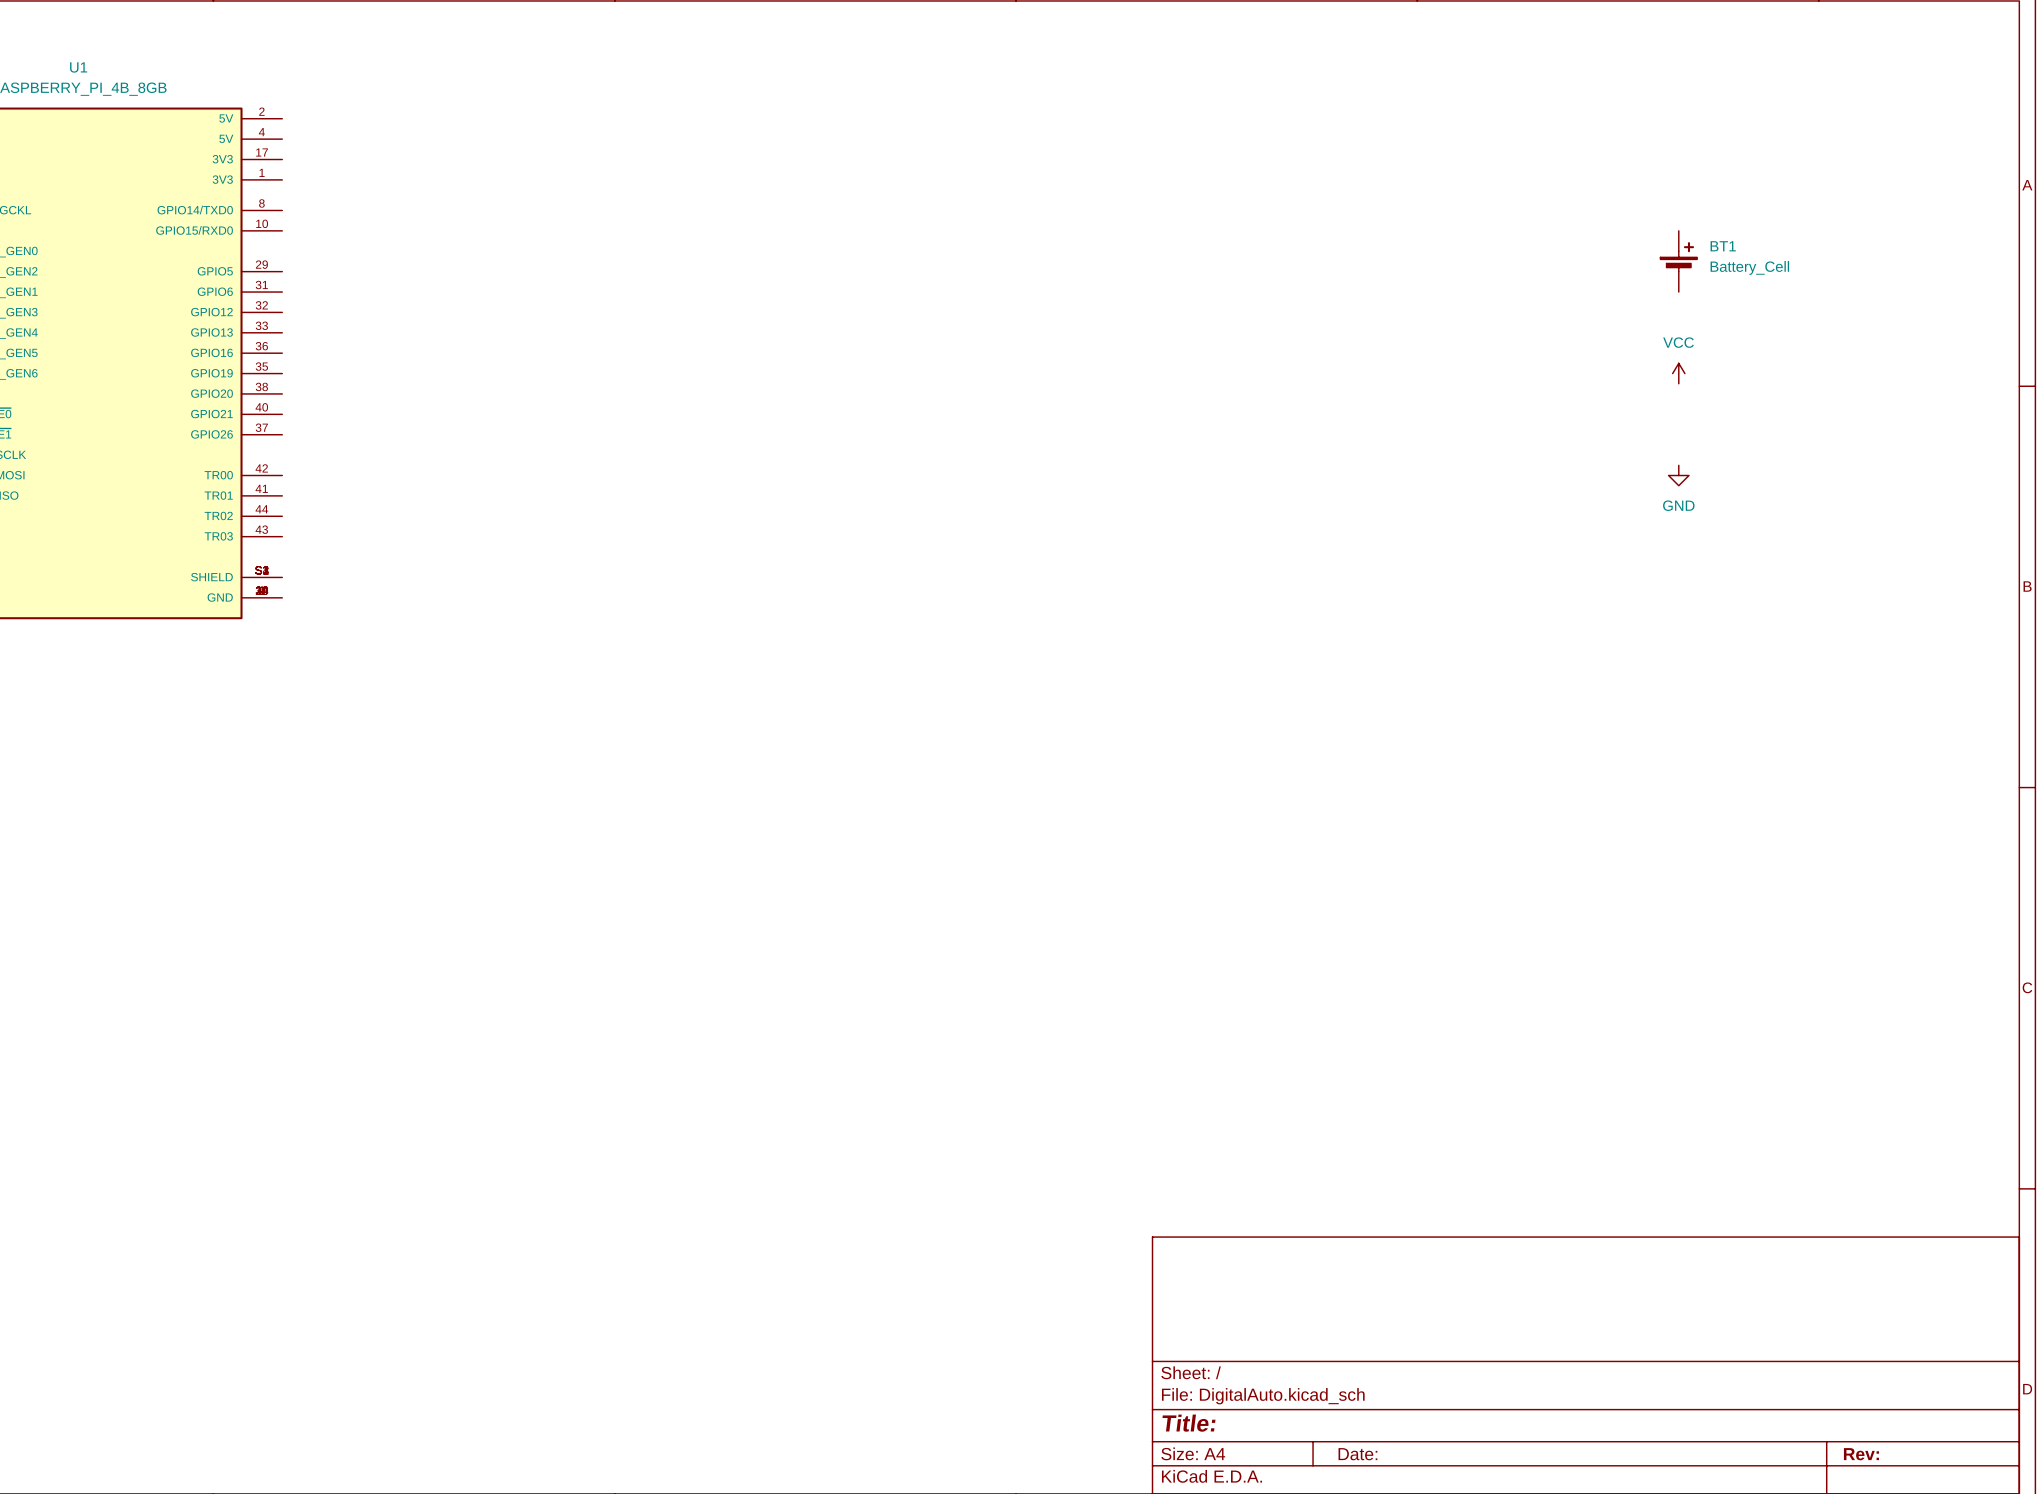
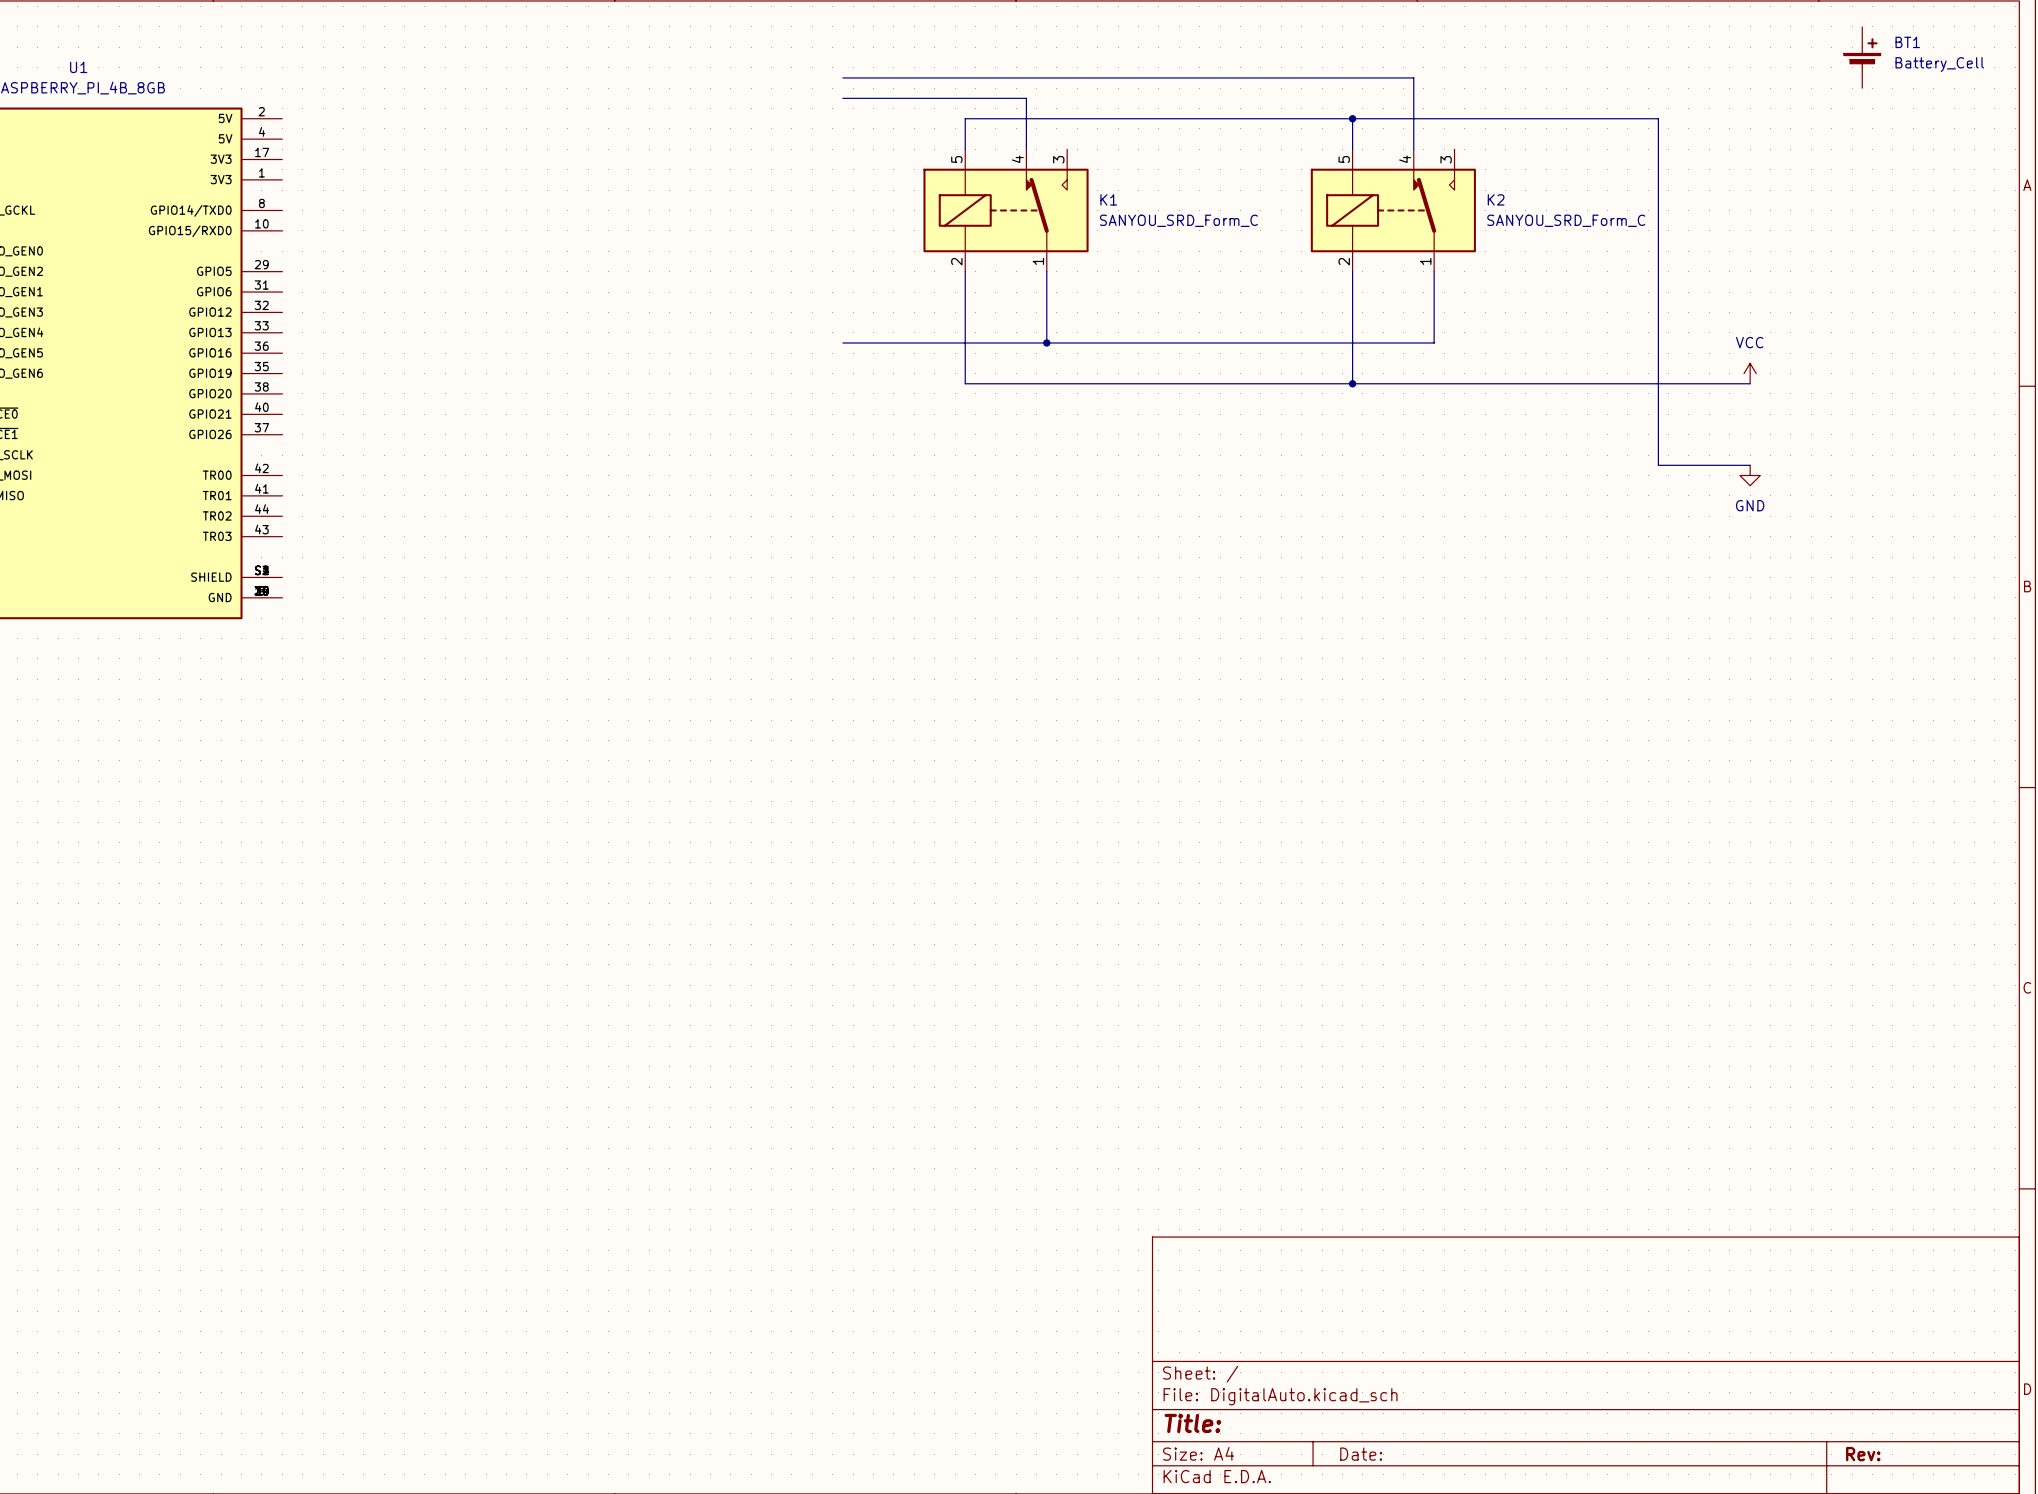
wire: none -> (842, 77) (1413, 77) (1413, 149)
wire: none -> (842, 98) (1026, 98) (1026, 149)
wire: none -> (1352, 118) (1352, 149)
junction: none -> (1352, 118)
wire: none -> (965, 149) (965, 118) (1658, 118) (1658, 465) (1750, 465)
K1: none -> SANYOU_SRD_Form_C (1006, 210)
K2: none -> SANYOU_SRD_Form_C (1393, 210)
BT1 position: (1678, 261) -> (1862, 57)
wire: none -> (965, 271) (965, 383) (1750, 383)
wire: none -> (1046, 271) (1046, 342)
wire: none -> (1352, 271) (1352, 383)
wire: none -> (1434, 271) (1434, 342) (842, 342)
junction: none -> (1046, 342)
power symbol position: VCC (1678, 373) -> VCC (1750, 373)
junction: none -> (1352, 383)
power symbol position: GND (1678, 475) -> GND (1750, 475)

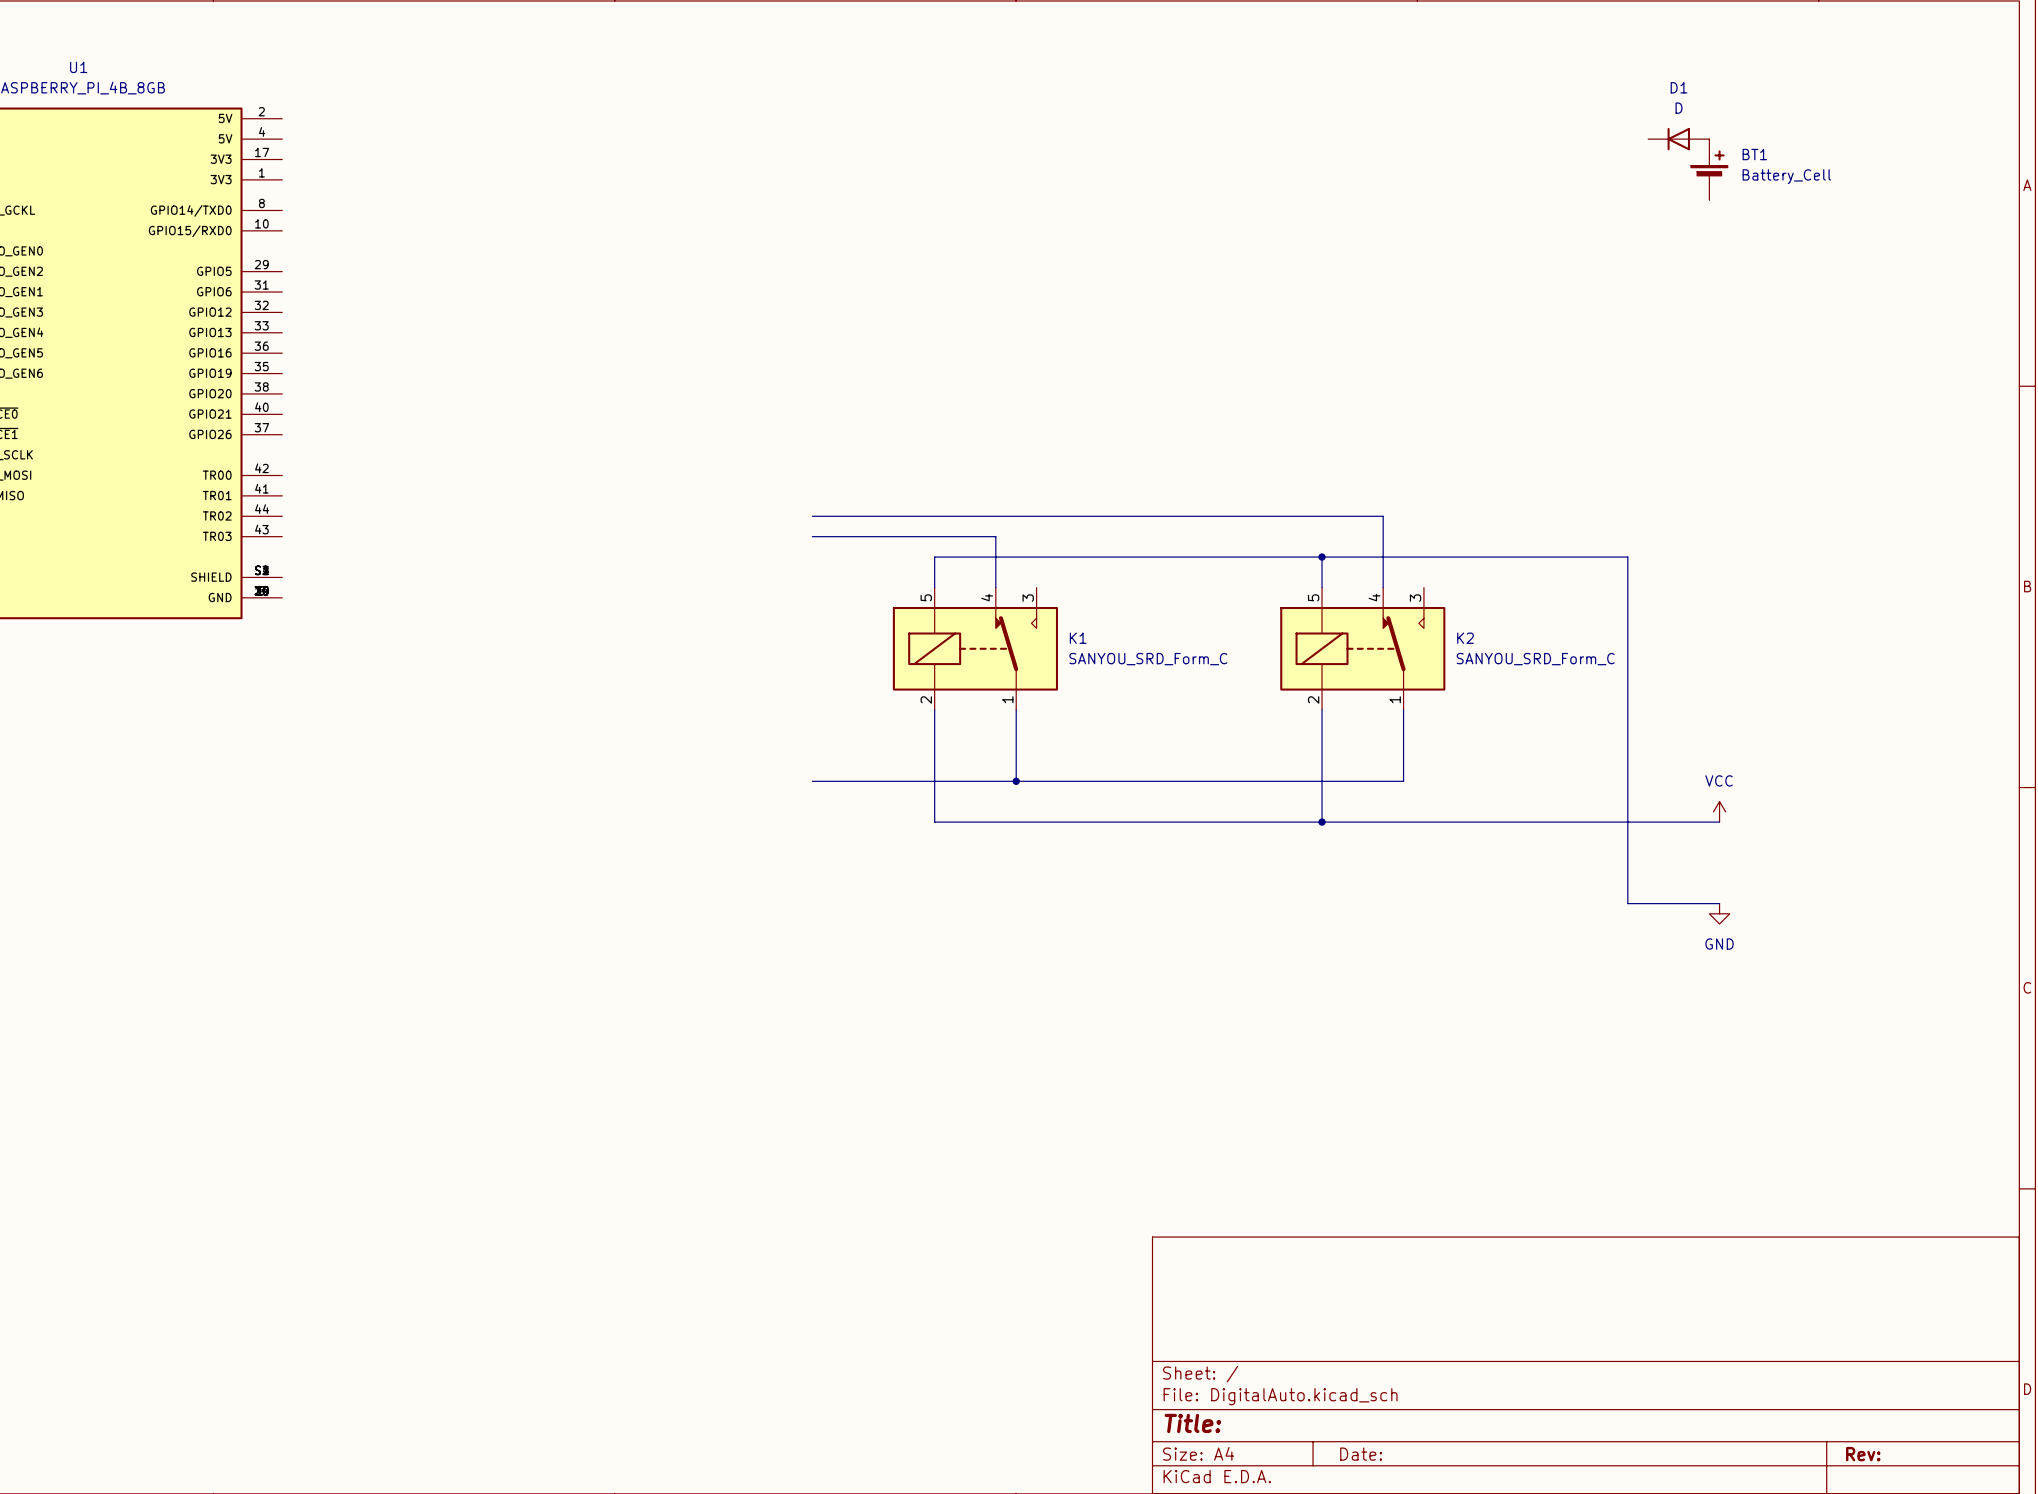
BT1 position: (1862, 57) -> (1709, 169)
wire: (842, 77) (1413, 77) (1413, 149) -> none
wire: (842, 98) (1026, 98) (1026, 149) -> none
wire: (1352, 118) (1352, 149) -> none
junction: (1352, 118) -> none
D1: none -> D (1678, 139)
wire: (965, 149) (965, 118) (1658, 118) (1658, 465) (1750, 465) -> none
K1 position: (1006, 210) -> (975, 648)
K2 position: (1393, 210) -> (1362, 648)
wire: (965, 271) (965, 383) (1750, 383) -> none
wire: (1046, 271) (1046, 342) -> none
wire: (1352, 271) (1352, 383) -> none
wire: (1434, 271) (1434, 342) (842, 342) -> none
junction: (1046, 342) -> none
power symbol: VCC (1750, 373) -> none
junction: (1352, 383) -> none
power symbol: GND (1750, 475) -> none
wire: none -> (812, 516) (1383, 516) (1383, 587)
wire: none -> (812, 536) (995, 536) (995, 587)
wire: none -> (1322, 557) (1322, 587)
junction: none -> (1322, 557)
wire: none -> (934, 587) (934, 557) (1627, 557) (1627, 903) (1719, 903)
wire: none -> (934, 709) (934, 822) (1719, 822)
wire: none -> (1016, 709) (1016, 781)
wire: none -> (1322, 709) (1322, 822)
wire: none -> (1403, 709) (1403, 781) (812, 781)
junction: none -> (1016, 781)
power symbol: none -> VCC (1719, 811)
junction: none -> (1322, 822)
power symbol: none -> GND (1719, 913)

